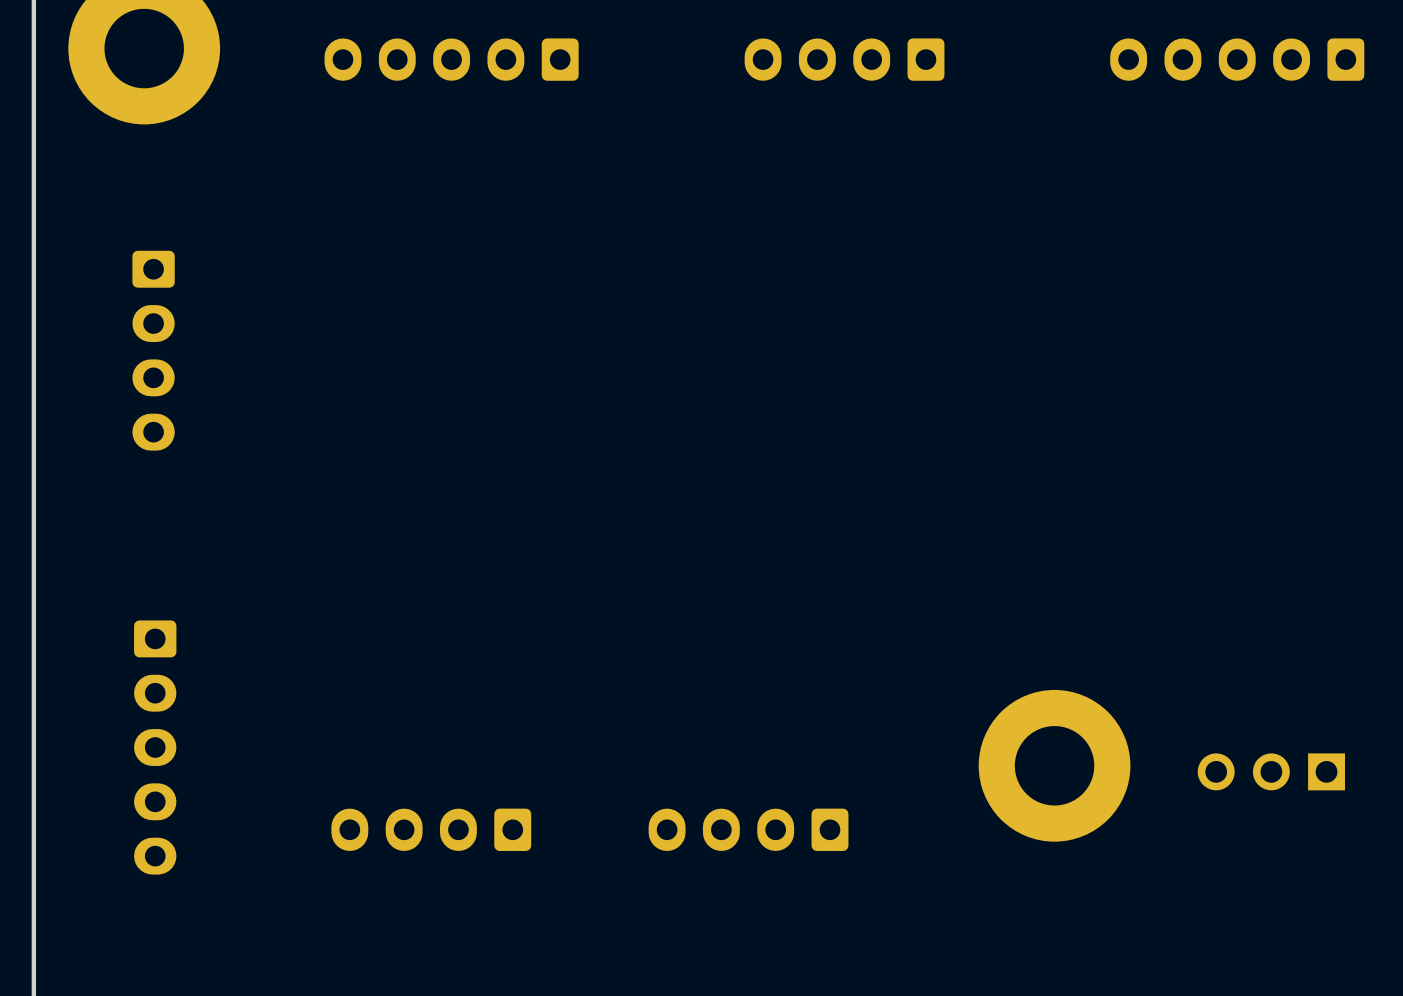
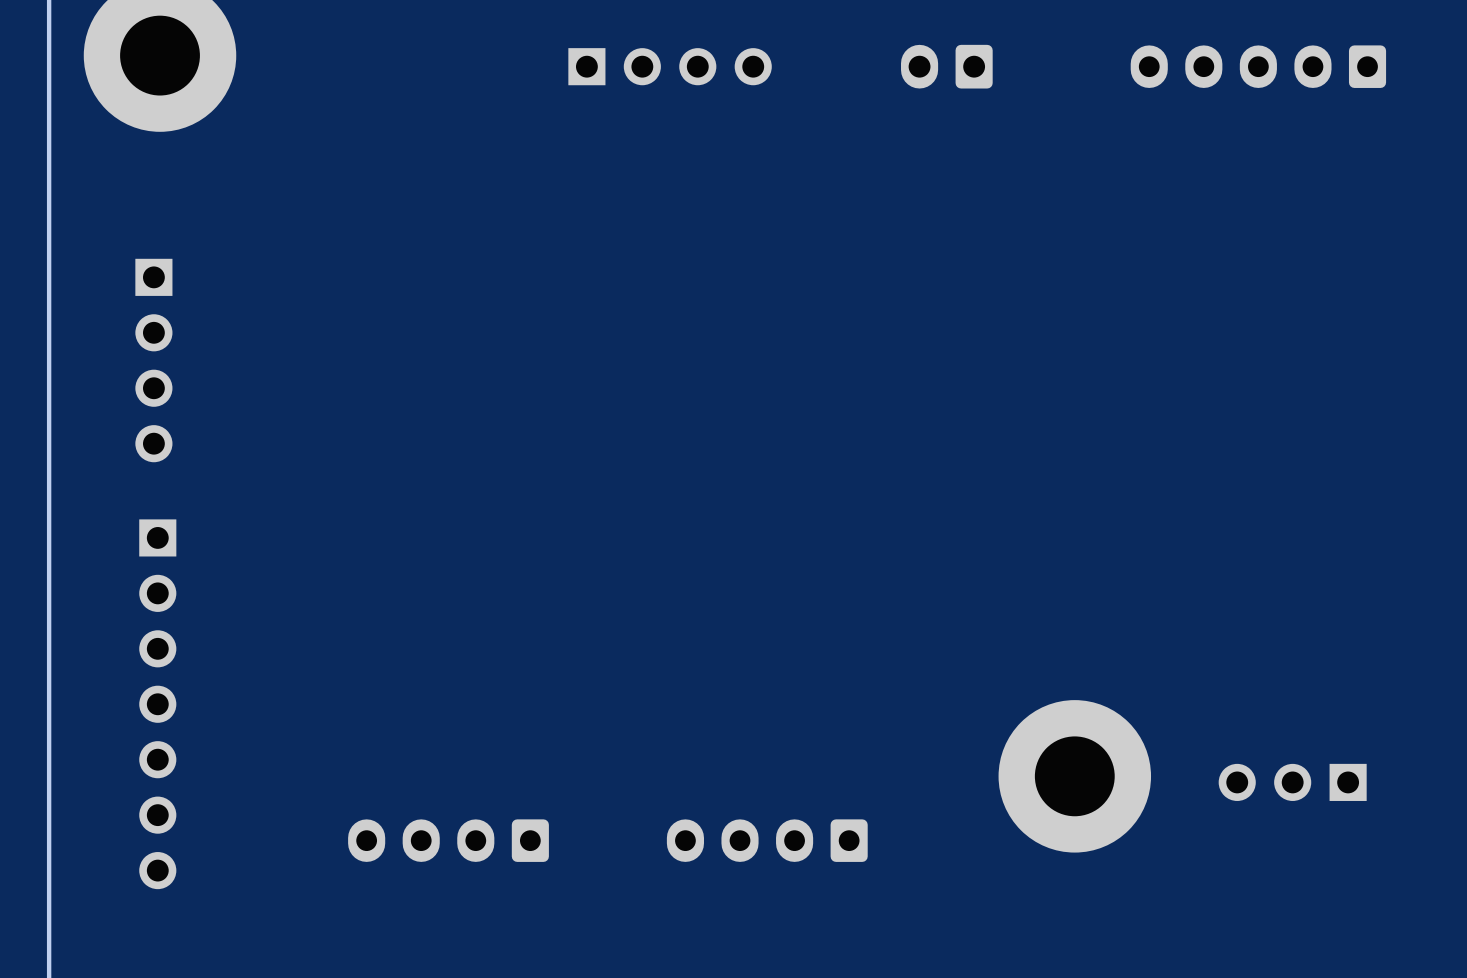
part: (451, 59) -> none
part: none -> (670, 66)
part: (844, 59) -> none
part: none -> (946, 66)
part footprint: [132, 250, 175, 451] -> [135, 258, 173, 463]
part: none -> (157, 704)
part: (155, 747) -> none

